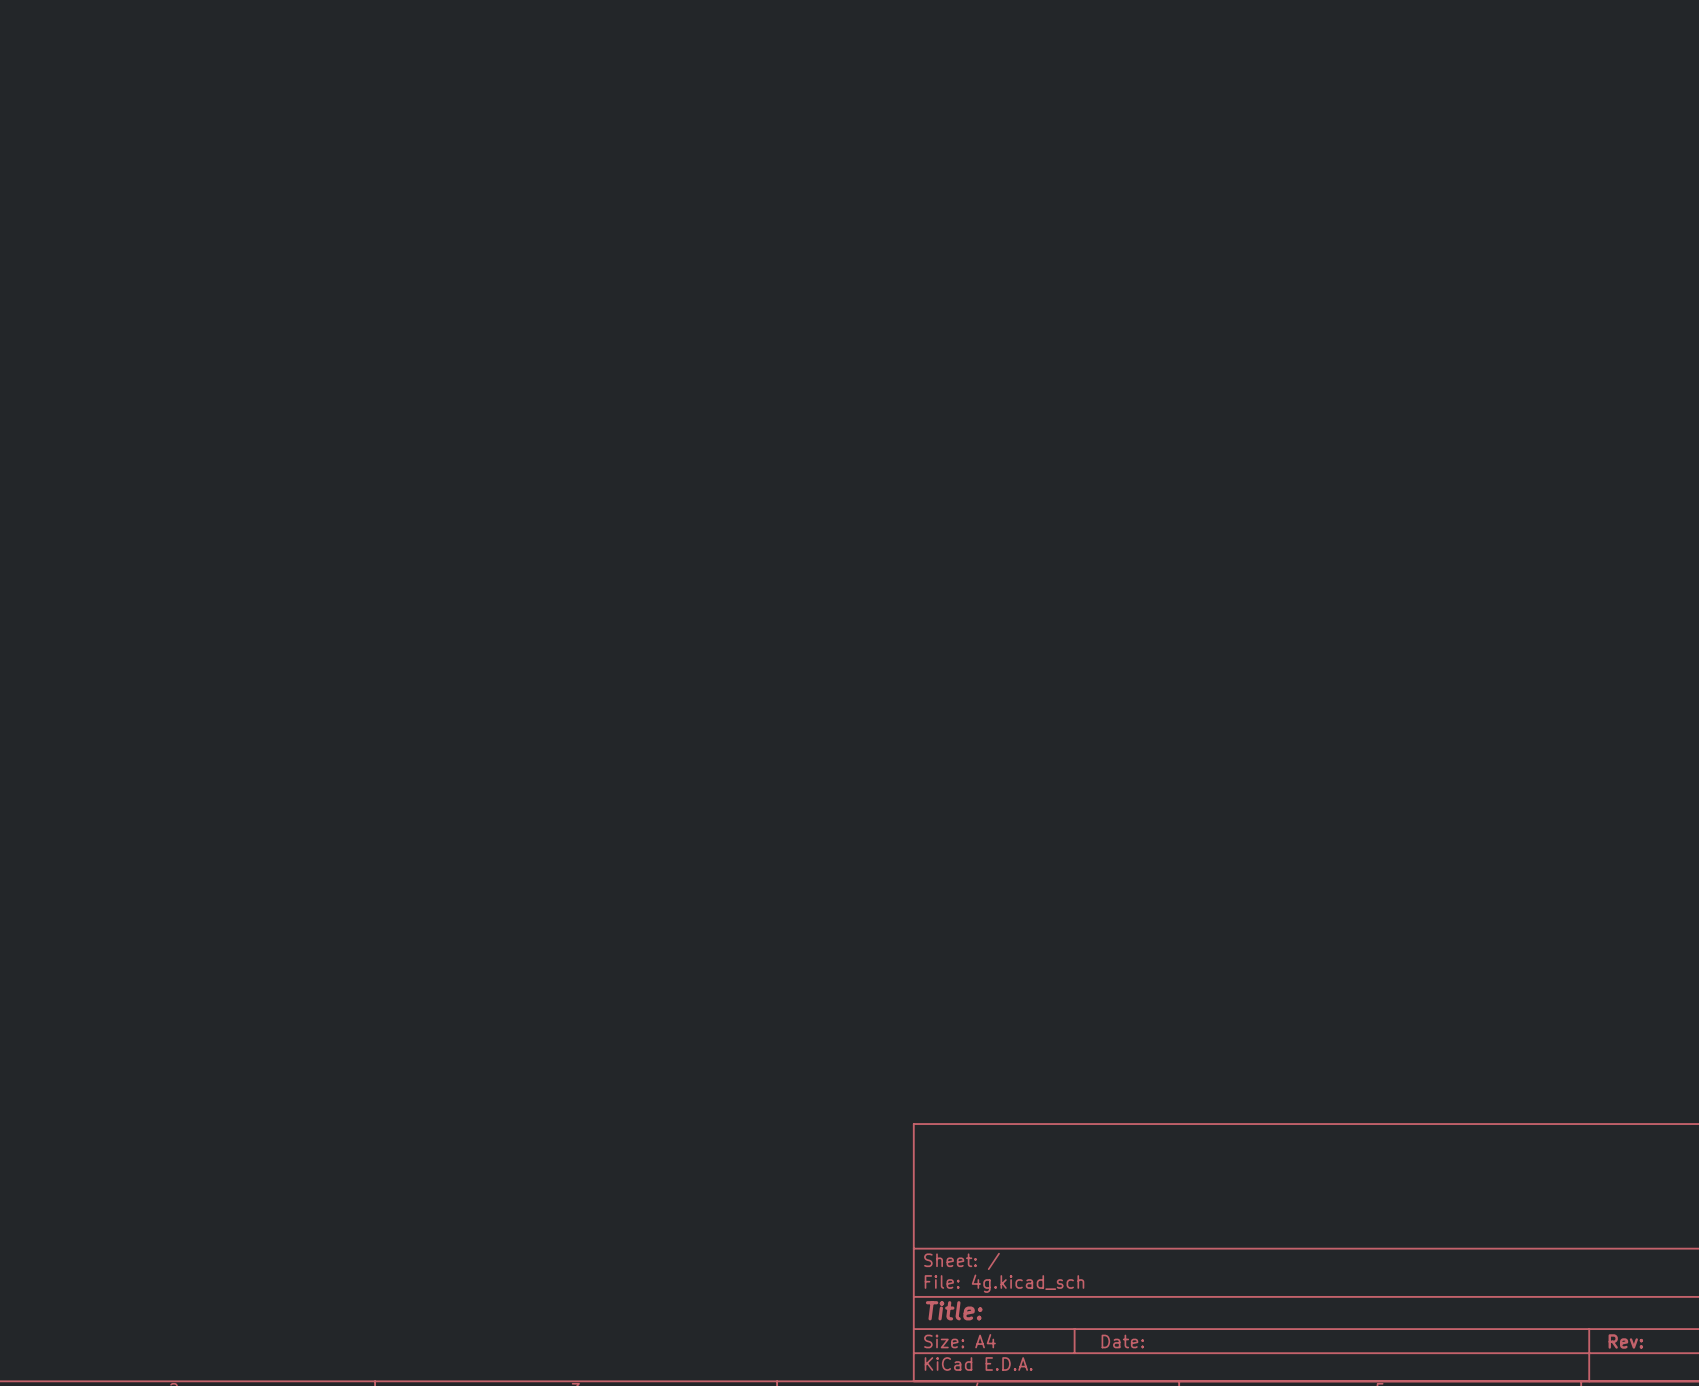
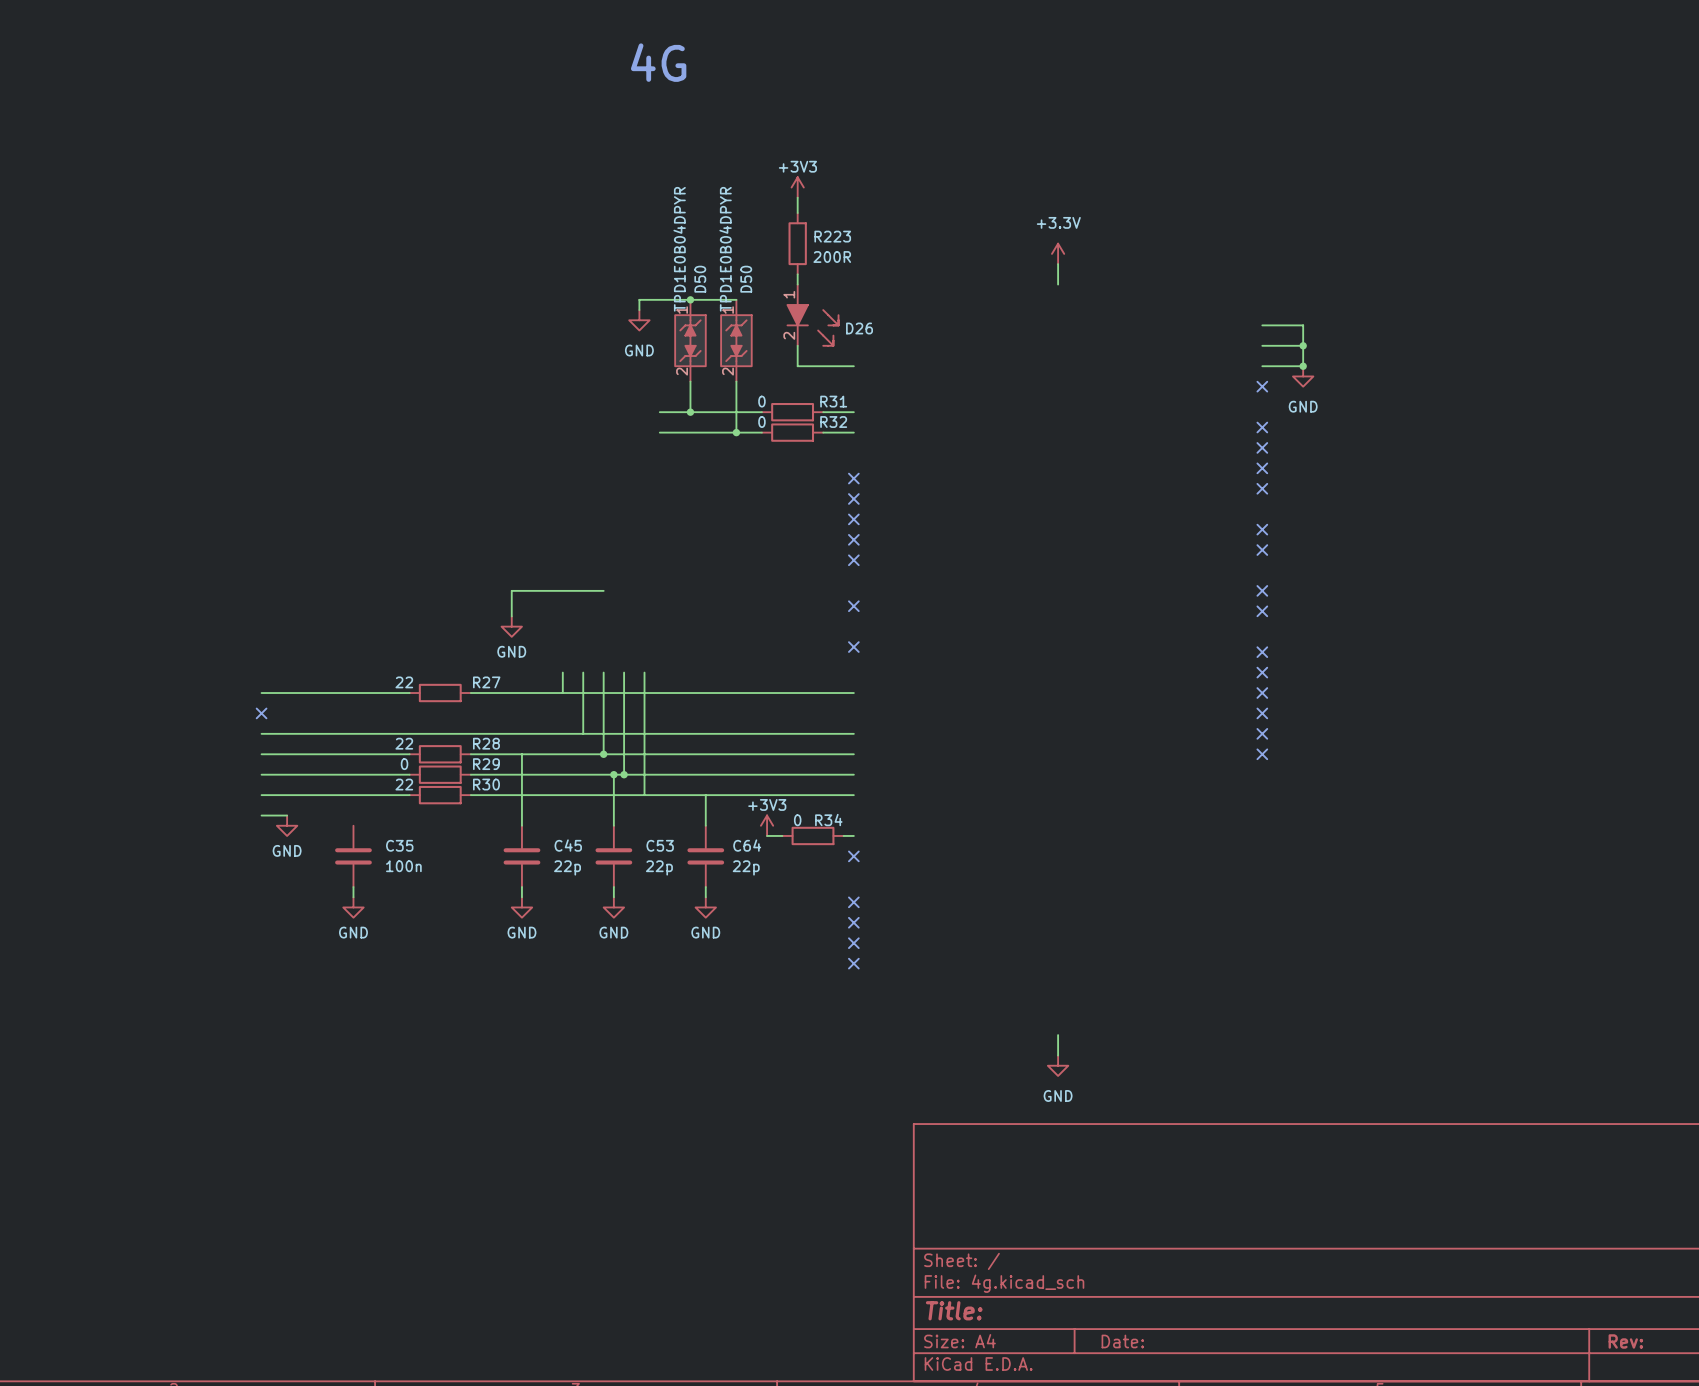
text: none -> 4G (658, 62)
power symbol: none -> +3V3 (797, 187)
wire: none -> (797, 197) (797, 213)
R223: none -> (797, 243)
power symbol: none -> +3.3V (1058, 253)
wire: none -> (1058, 264) (1058, 284)
wire: none -> (797, 274) (797, 284)
junction: none -> (690, 299)
wire: none -> (736, 299) (639, 299) (639, 310)
D26: none -> (813, 315)
power symbol: none -> GND (639, 320)
wire: none -> (1262, 325) (1303, 325) (1303, 366) (1262, 366)
D50: none -> TPD1E0B04DPYR (690, 340)
D50: none -> TPD1E0B04DPYR (736, 340)
wire: none -> (797, 345) (797, 366) (853, 366)
wire: none -> (1262, 345) (1303, 345)
junction: none -> (1303, 345)
junction: none -> (1303, 366)
power symbol: none -> GND (1303, 376)
wire: none -> (690, 381) (690, 412)
wire: none -> (736, 381) (736, 432)
no-connect mark: none -> (1262, 386)
wire: none -> (659, 412) (761, 412)
junction: none -> (690, 412)
R31: none -> 0 (792, 412)
wire: none -> (823, 412) (853, 412)
no-connect mark: none -> (1262, 427)
wire: none -> (659, 432) (761, 432)
junction: none -> (736, 432)
R32: none -> 0 (792, 432)
wire: none -> (823, 432) (853, 432)
no-connect mark: none -> (1262, 447)
no-connect mark: none -> (1262, 468)
no-connect mark: none -> (853, 478)
no-connect mark: none -> (1262, 488)
no-connect mark: none -> (853, 498)
no-connect mark: none -> (853, 519)
no-connect mark: none -> (1262, 529)
no-connect mark: none -> (853, 539)
no-connect mark: none -> (1262, 550)
no-connect mark: none -> (853, 560)
wire: none -> (603, 590) (511, 590) (511, 616)
no-connect mark: none -> (1262, 590)
no-connect mark: none -> (853, 606)
no-connect mark: none -> (1262, 611)
power symbol: none -> GND (511, 626)
no-connect mark: none -> (853, 647)
no-connect mark: none -> (1262, 652)
wire: none -> (562, 672) (562, 693)
wire: none -> (583, 672) (583, 733)
wire: none -> (603, 672) (603, 754)
wire: none -> (624, 672) (624, 774)
wire: none -> (644, 672) (644, 795)
no-connect mark: none -> (1262, 672)
wire: none -> (261, 693) (409, 693)
R27: none -> 22 (440, 693)
wire: none -> (470, 693) (853, 693)
no-connect mark: none -> (1262, 693)
no-connect mark: none -> (261, 713)
no-connect mark: none -> (1262, 713)
wire: none -> (261, 733) (853, 733)
no-connect mark: none -> (1262, 733)
wire: none -> (261, 754) (409, 754)
R28: none -> 22 (440, 754)
wire: none -> (470, 754) (853, 754)
wire: none -> (521, 754) (521, 825)
junction: none -> (603, 754)
no-connect mark: none -> (1262, 754)
wire: none -> (261, 774) (409, 774)
R29: none -> 0 (440, 774)
wire: none -> (470, 774) (853, 774)
wire: none -> (613, 774) (613, 825)
junction: none -> (613, 774)
junction: none -> (624, 774)
wire: none -> (261, 795) (409, 795)
R30: none -> 22 (440, 795)
wire: none -> (470, 795) (853, 795)
wire: none -> (705, 795) (705, 825)
wire: none -> (261, 815) (287, 815)
power symbol: none -> GND (287, 825)
power symbol: none -> +3V3 (767, 825)
wire: none -> (767, 835) (782, 835)
R34: none -> 0 (813, 835)
wire: none -> (843, 835) (853, 835)
C35: none -> 100n (353, 856)
C45: none -> 22p (521, 856)
C53: none -> 22p (613, 856)
C64: none -> 22p (705, 856)
no-connect mark: none -> (853, 856)
wire: none -> (353, 887) (353, 897)
wire: none -> (521, 887) (521, 897)
wire: none -> (613, 887) (613, 897)
wire: none -> (705, 887) (705, 897)
no-connect mark: none -> (853, 902)
power symbol: none -> GND (353, 907)
power symbol: none -> GND (521, 907)
power symbol: none -> GND (613, 907)
power symbol: none -> GND (705, 907)
no-connect mark: none -> (853, 922)
no-connect mark: none -> (853, 943)
no-connect mark: none -> (853, 963)
wire: none -> (1058, 1035) (1058, 1055)
power symbol: none -> GND (1058, 1065)

